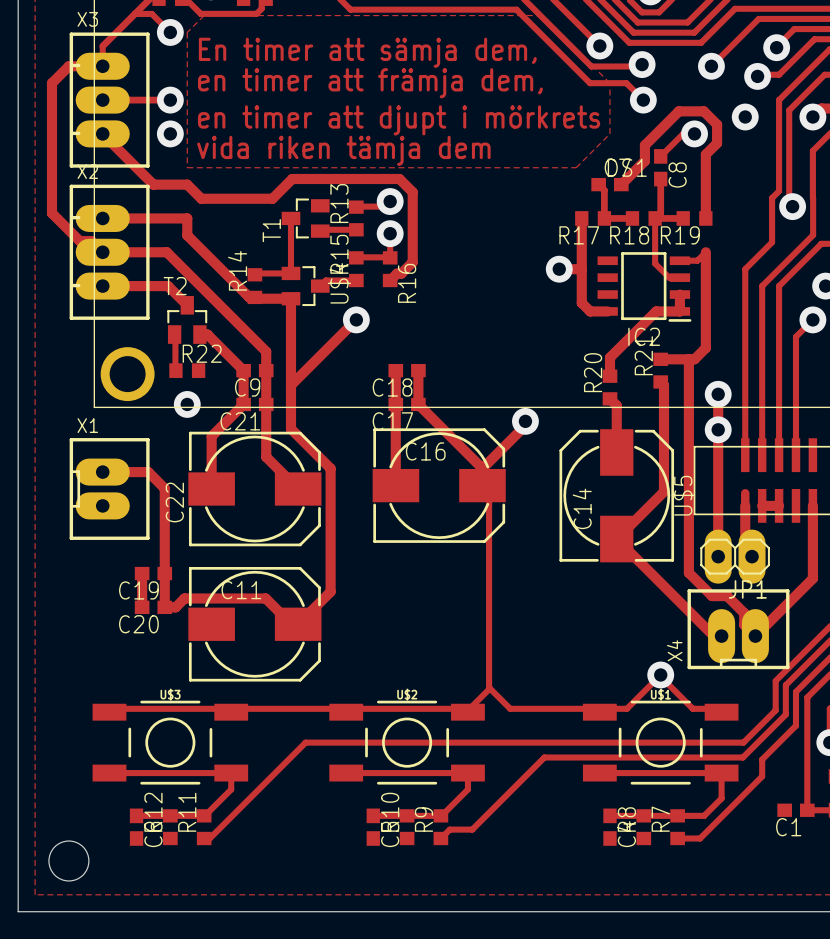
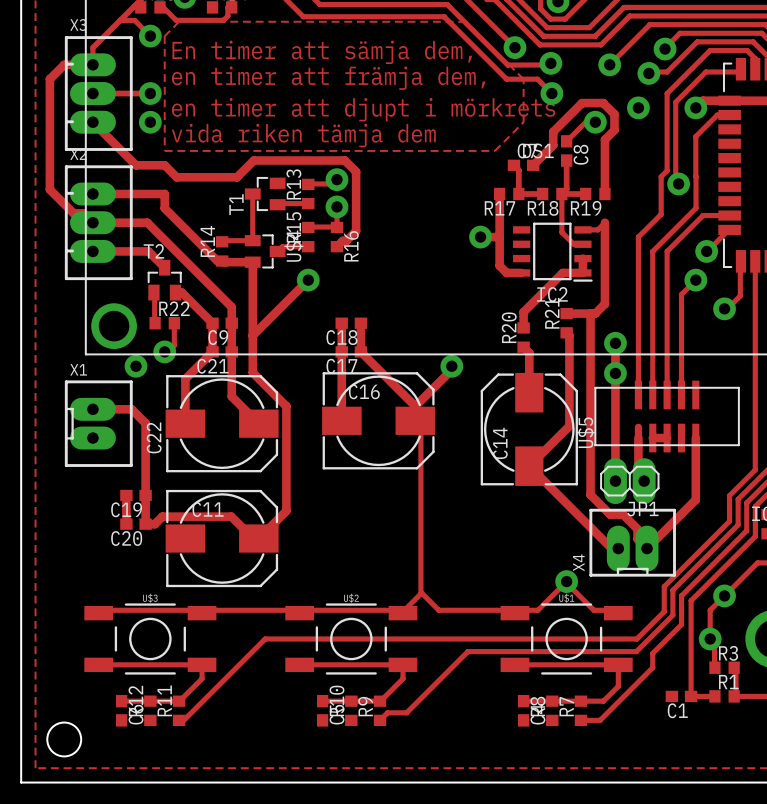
track: none -> (174, 323) (174, 345) (167, 351)
via: none -> (136, 366)

